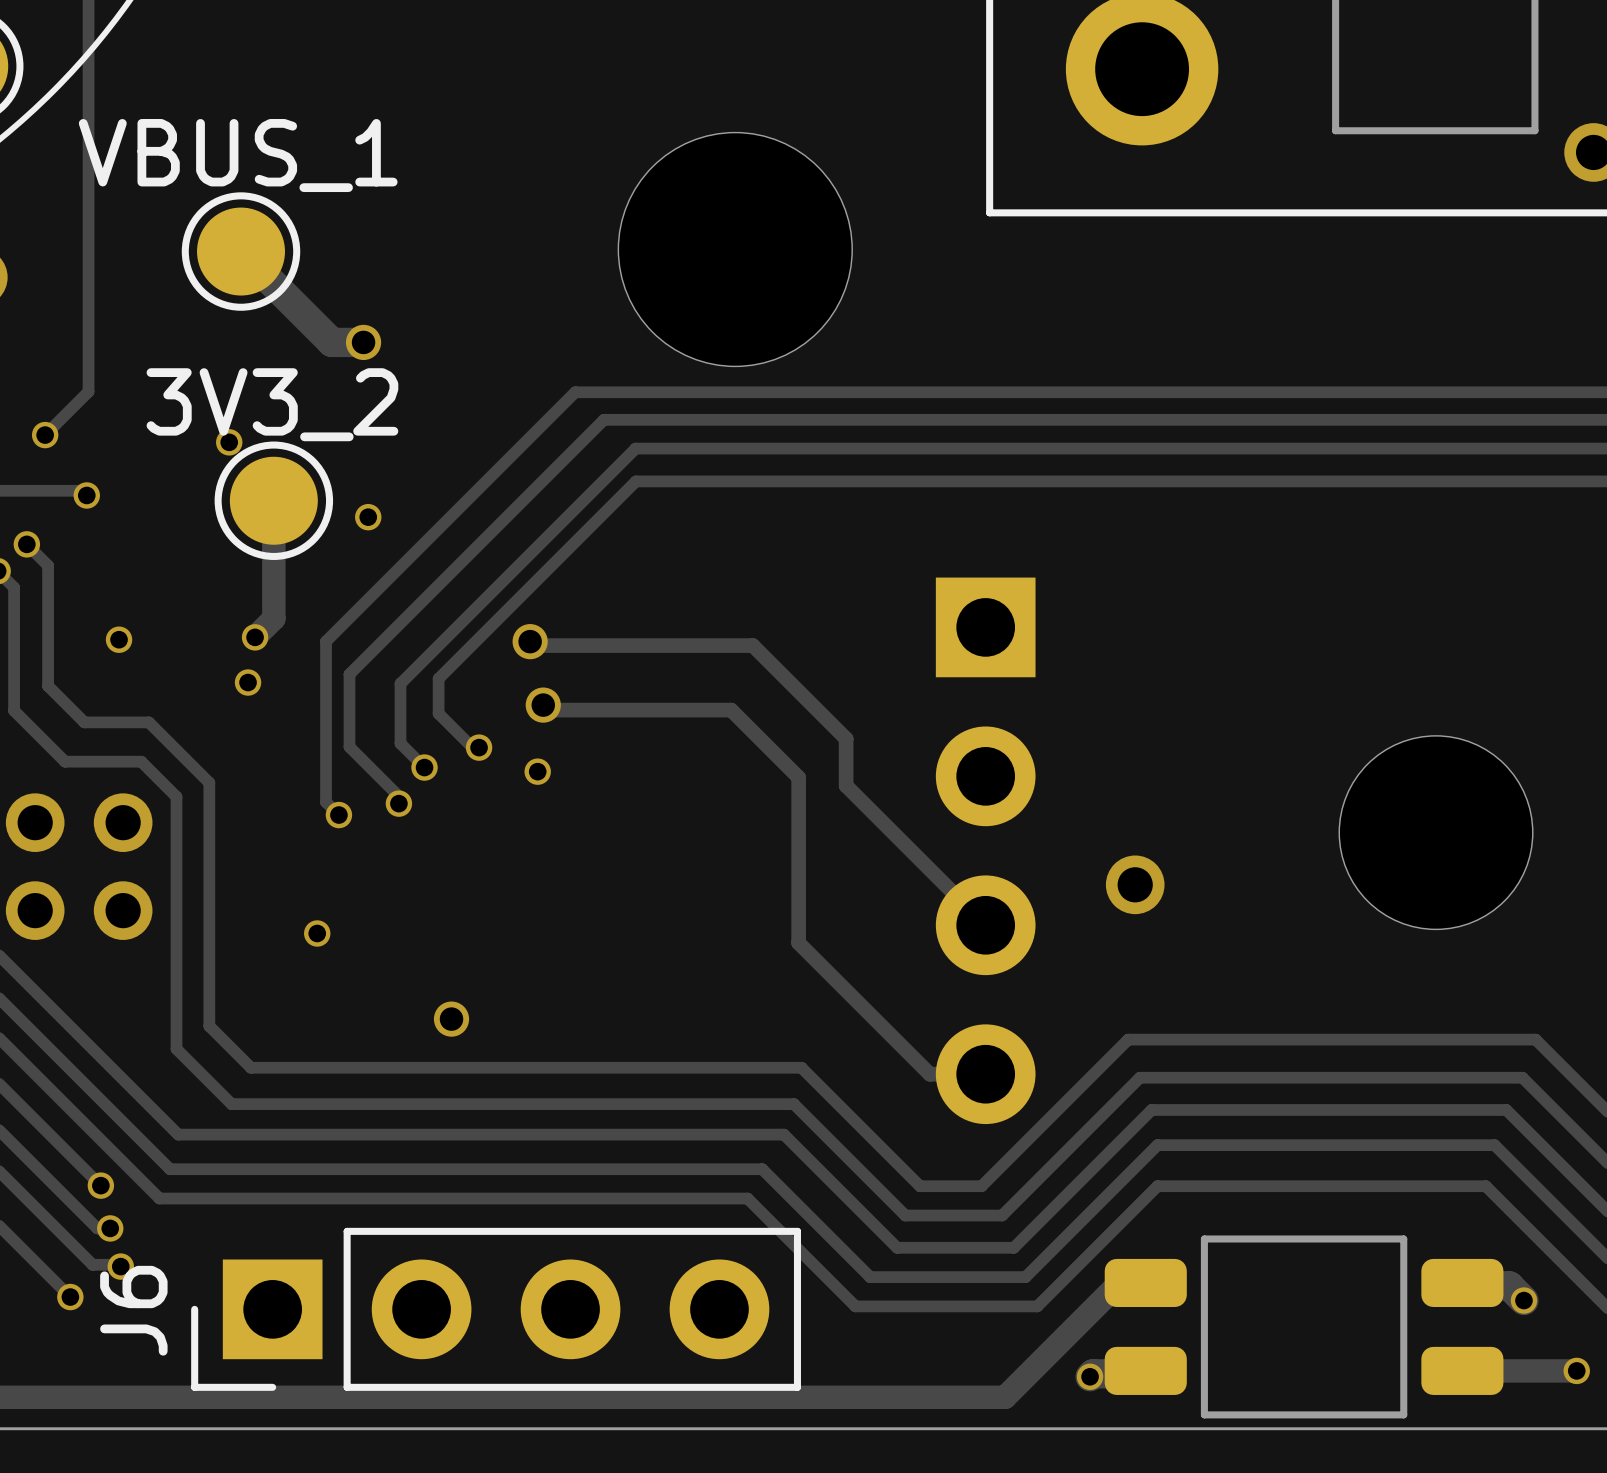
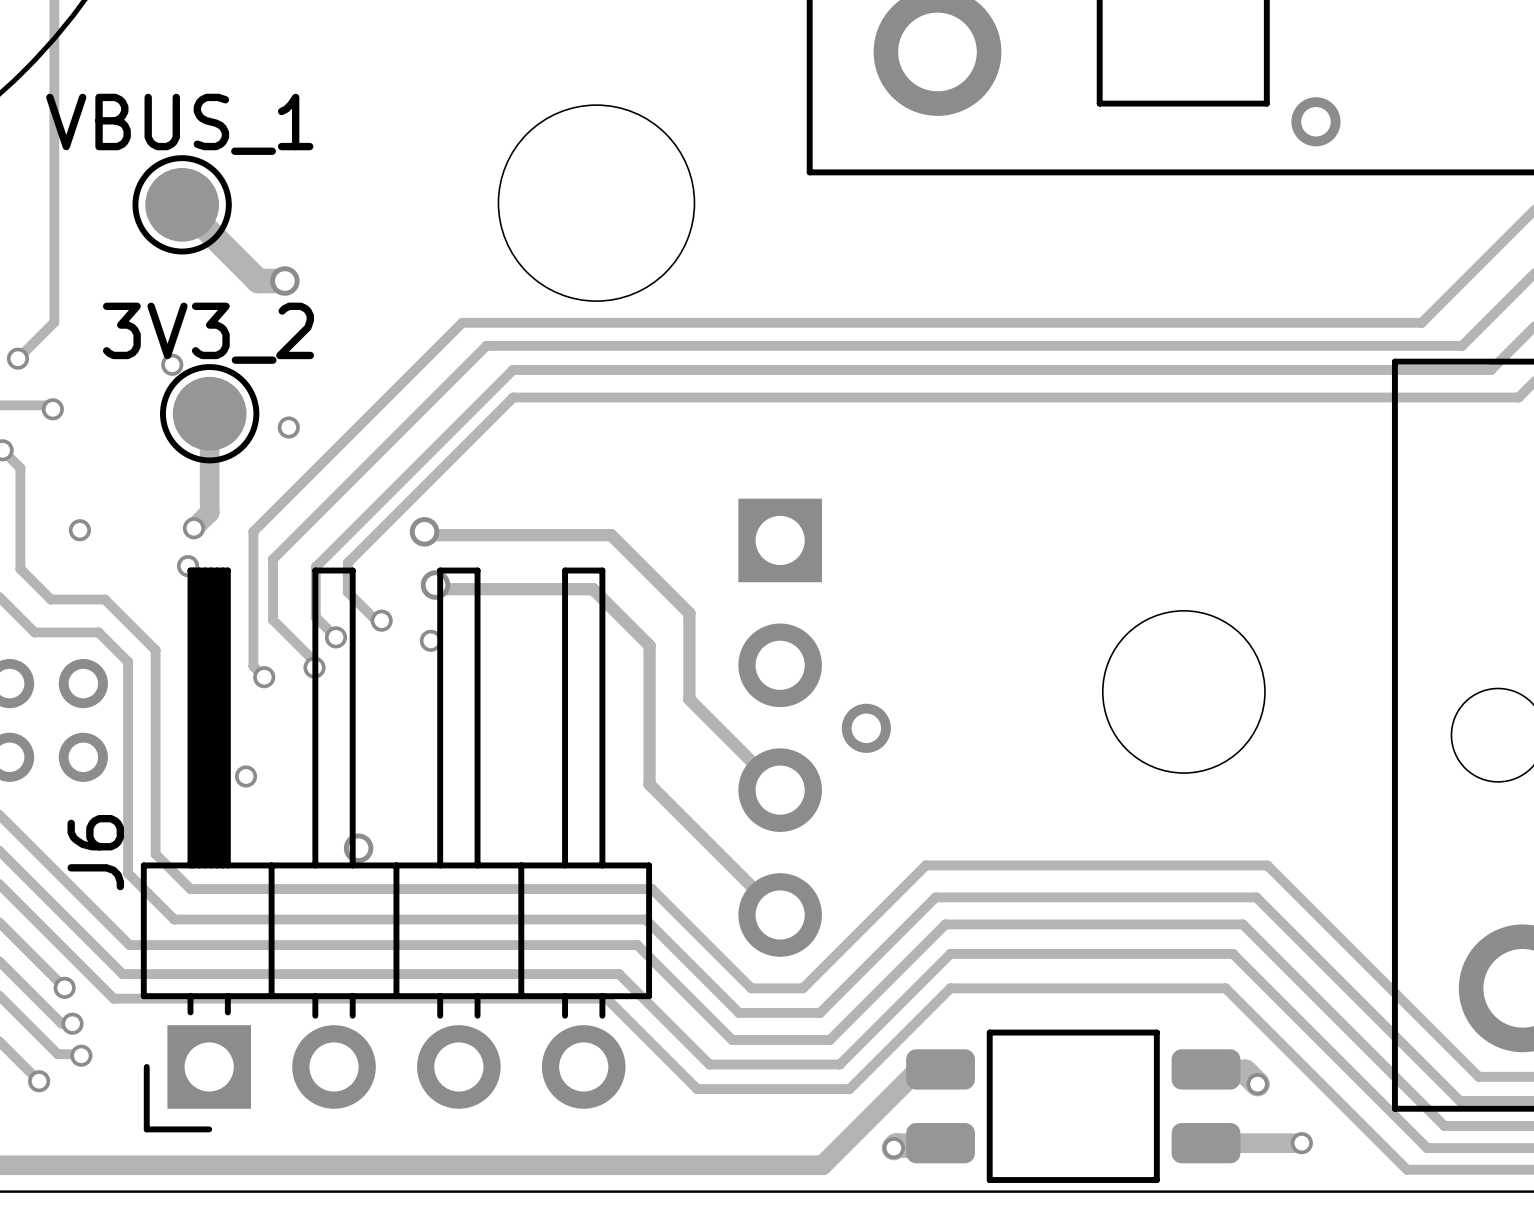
track: (846, 785) (985, 925) -> (689, 652) (689, 699) (780, 790)
part position: (985, 850) -> (780, 727)
via position: (1135, 884) -> (866, 728)
J6 footprint: [191, 1227, 801, 1391] -> [140, 567, 653, 1133]

